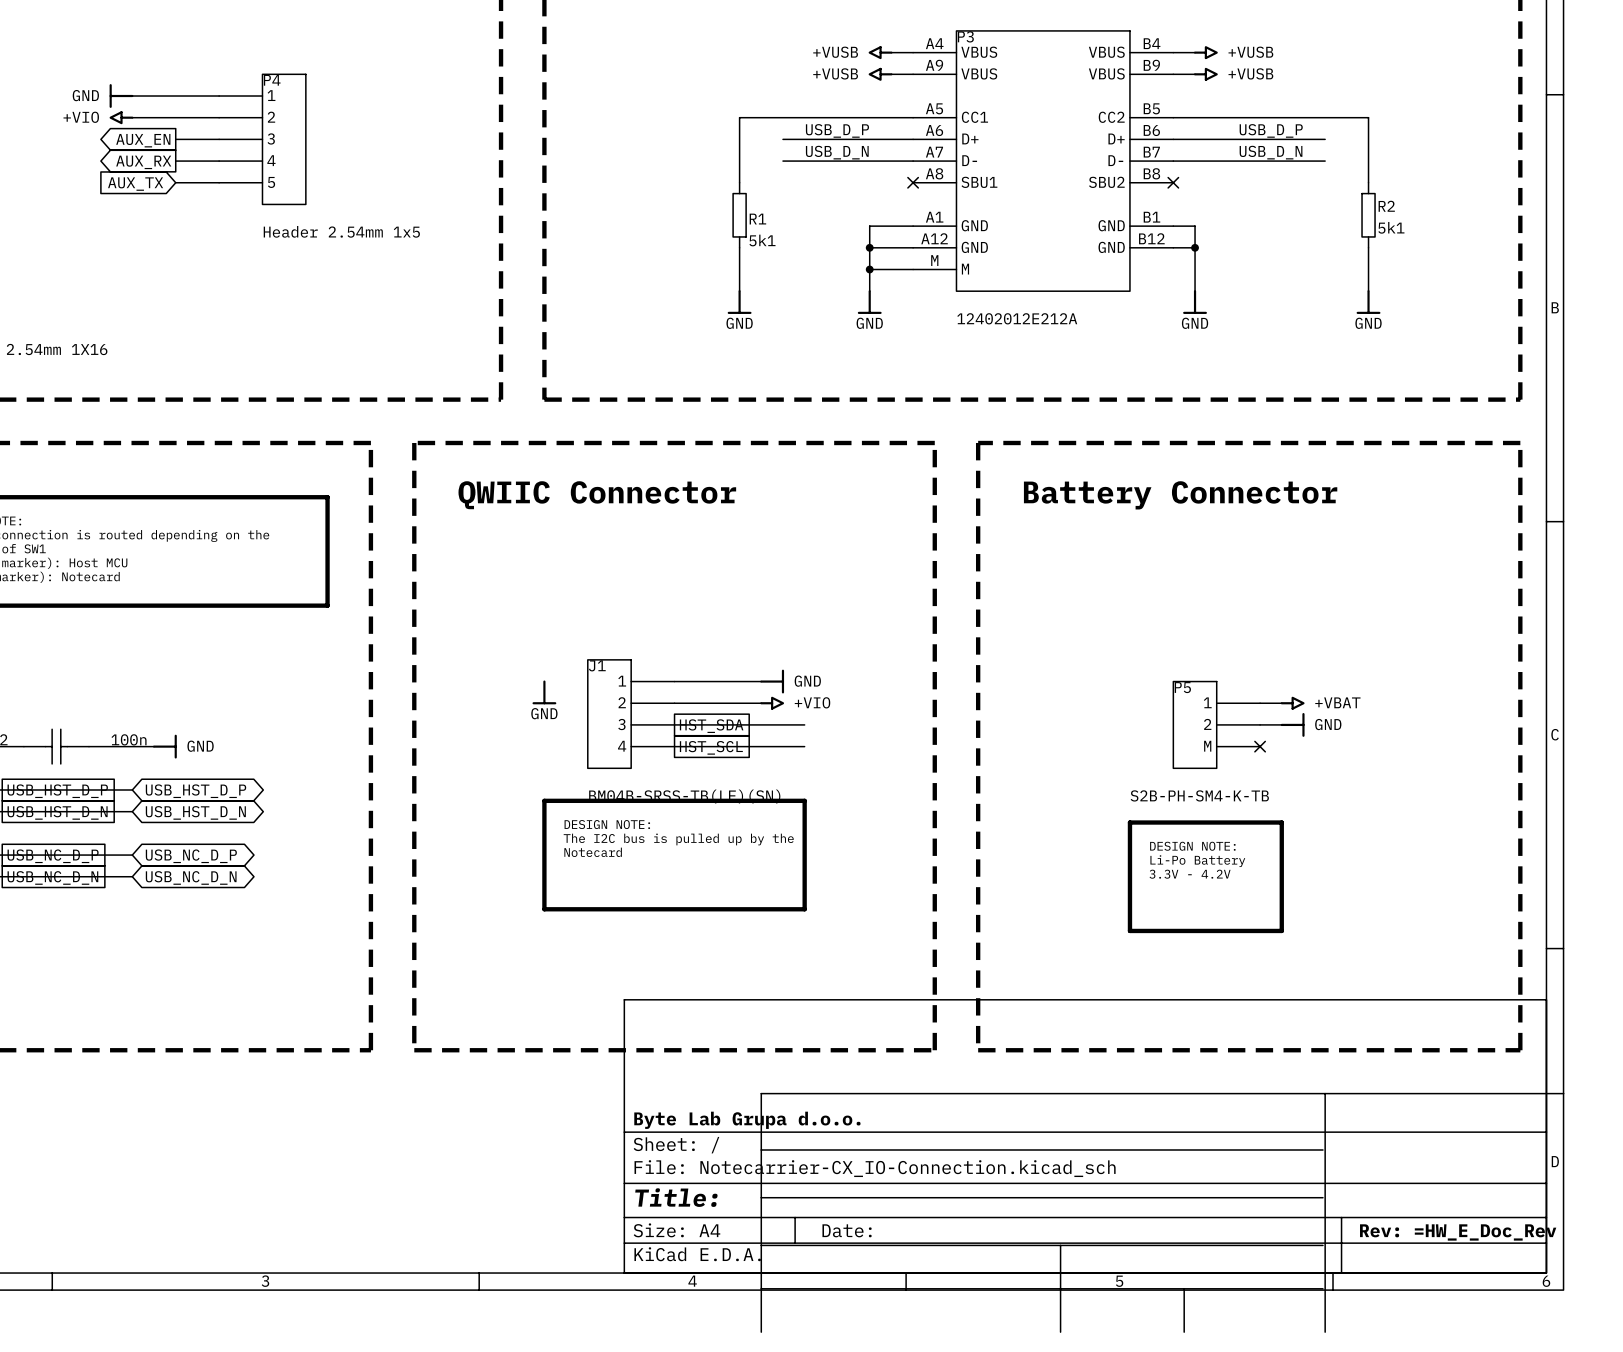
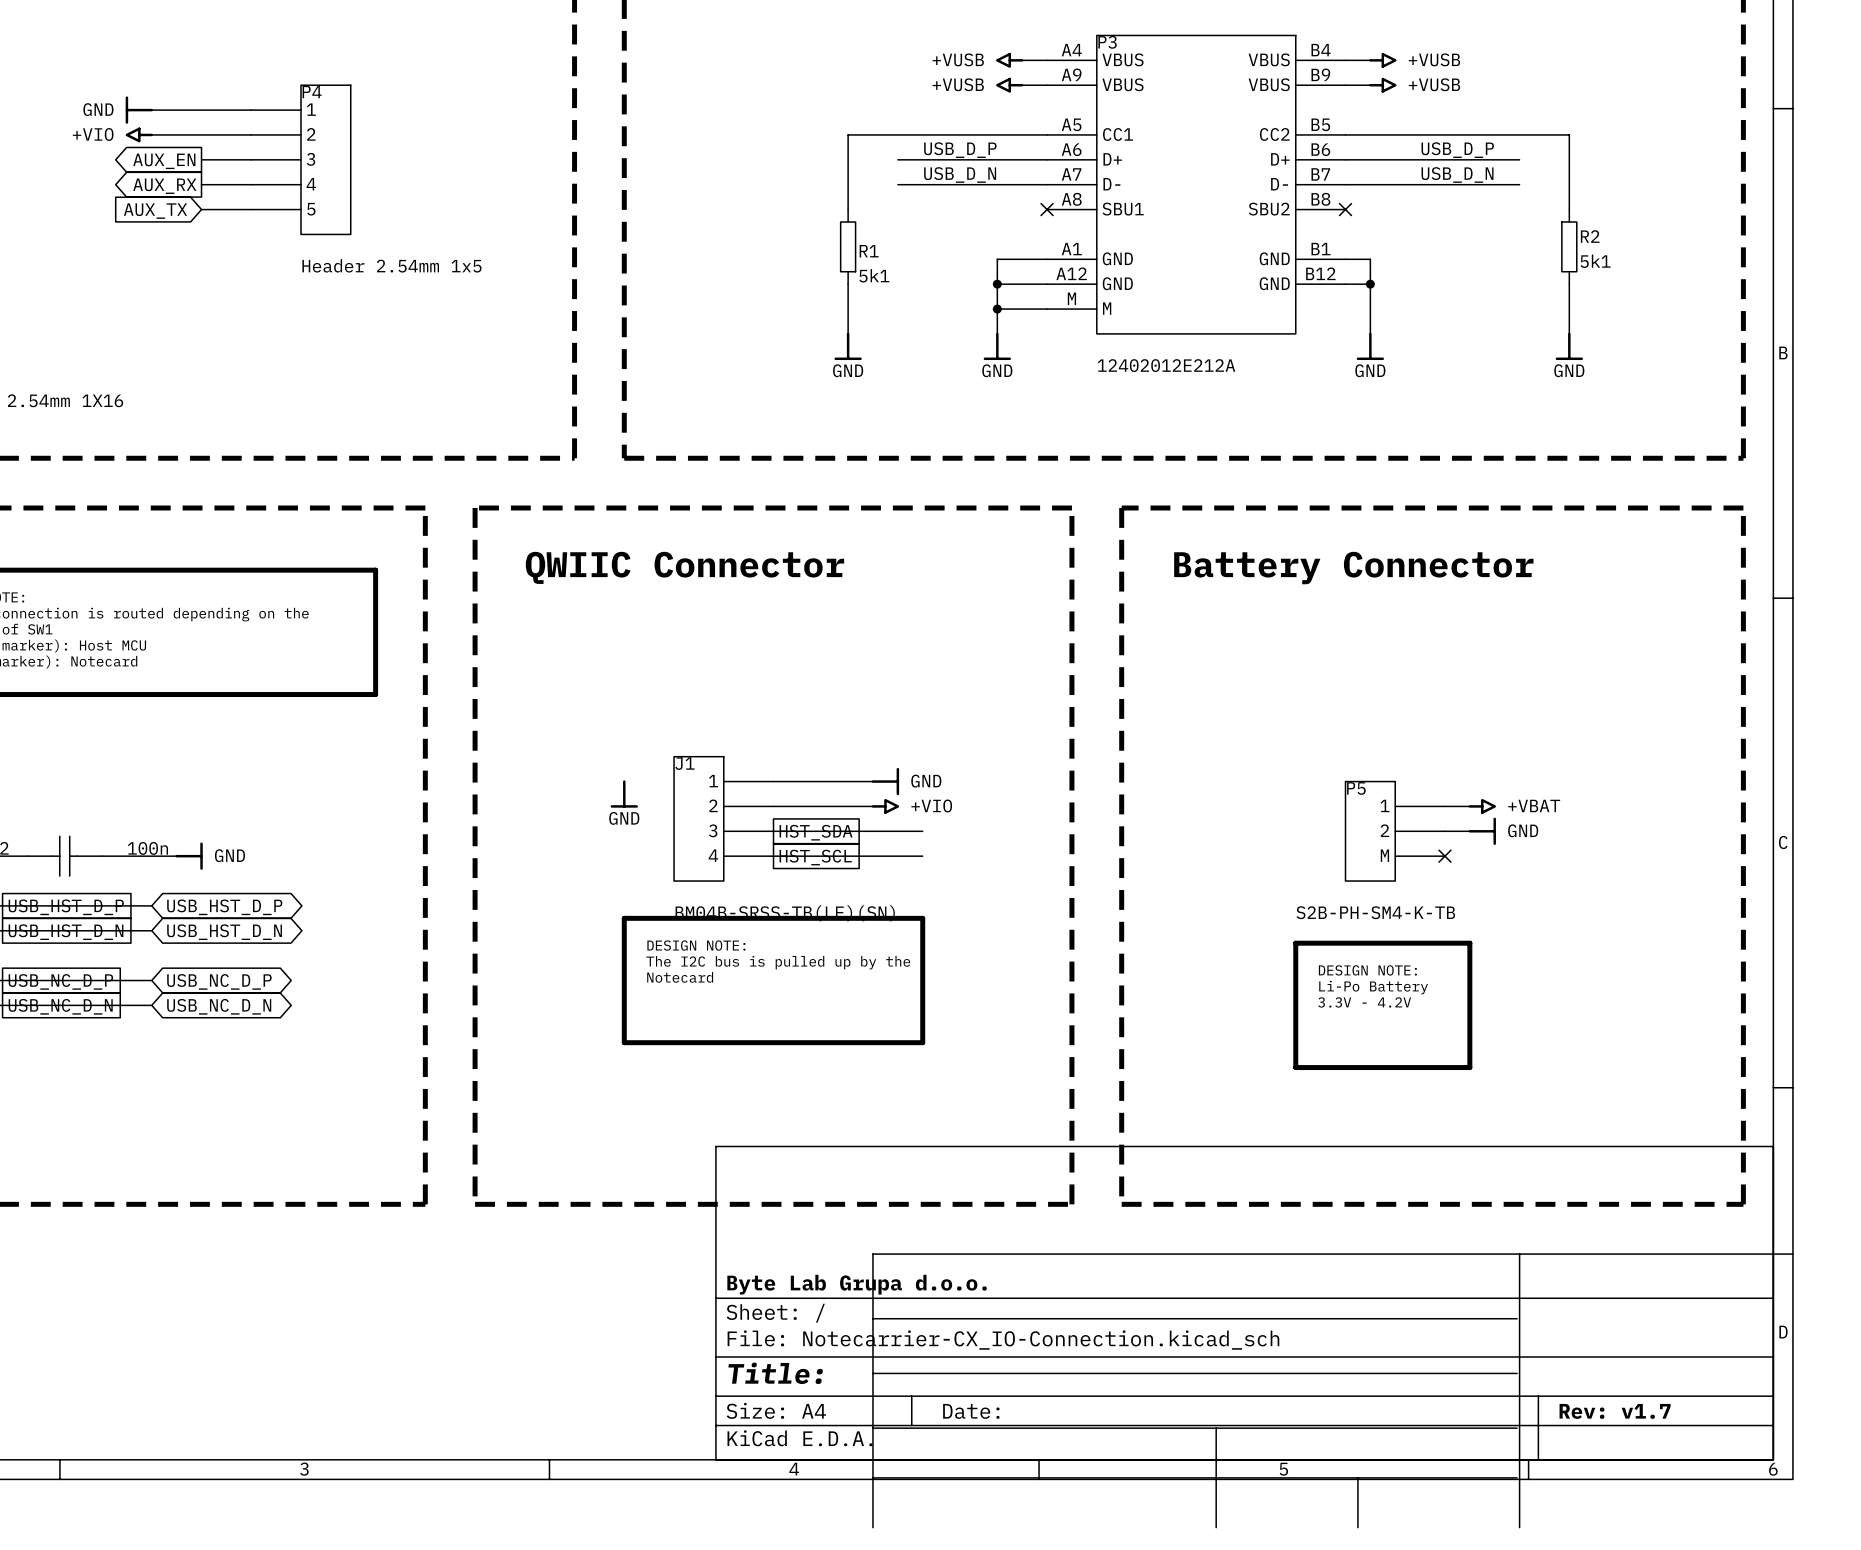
title block: Rev: =HW_E_Doc_Rev (1458, 1232) -> Rev: v1.7 (1615, 1411)

